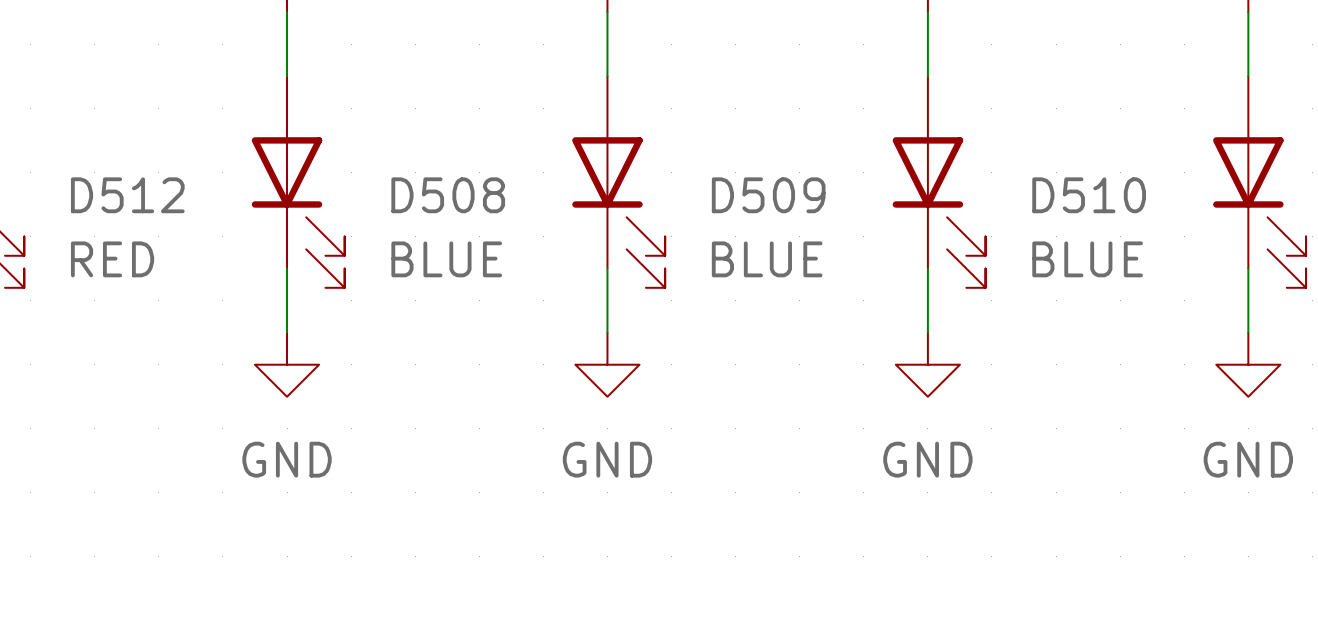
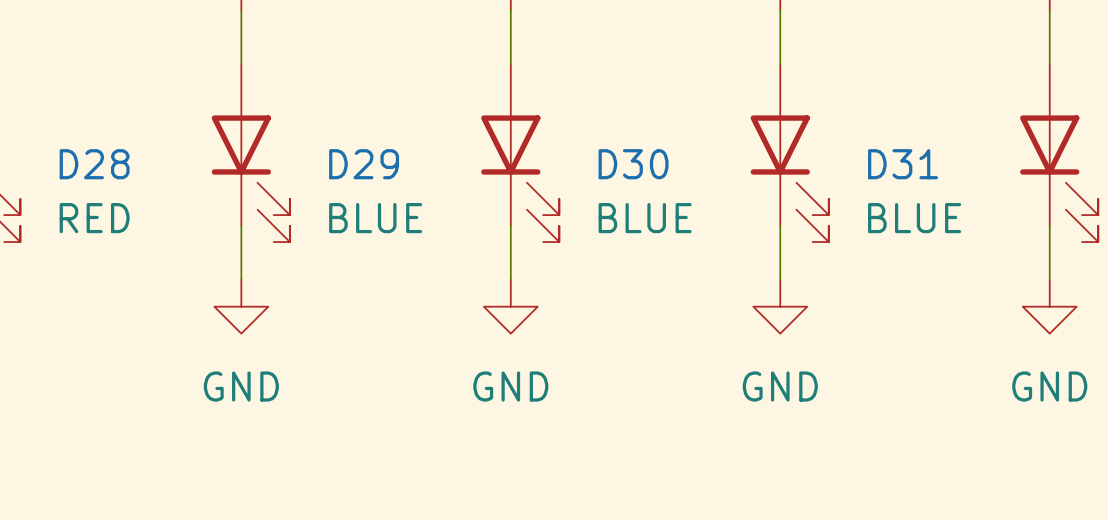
D512 name: D512 (127, 195) -> D28 (94, 164)
D508 name: D508 (448, 195) -> D29 (364, 164)
D509 name: D509 (768, 195) -> D30 (633, 164)
D510 name: D510 (1089, 195) -> D31 (903, 164)

